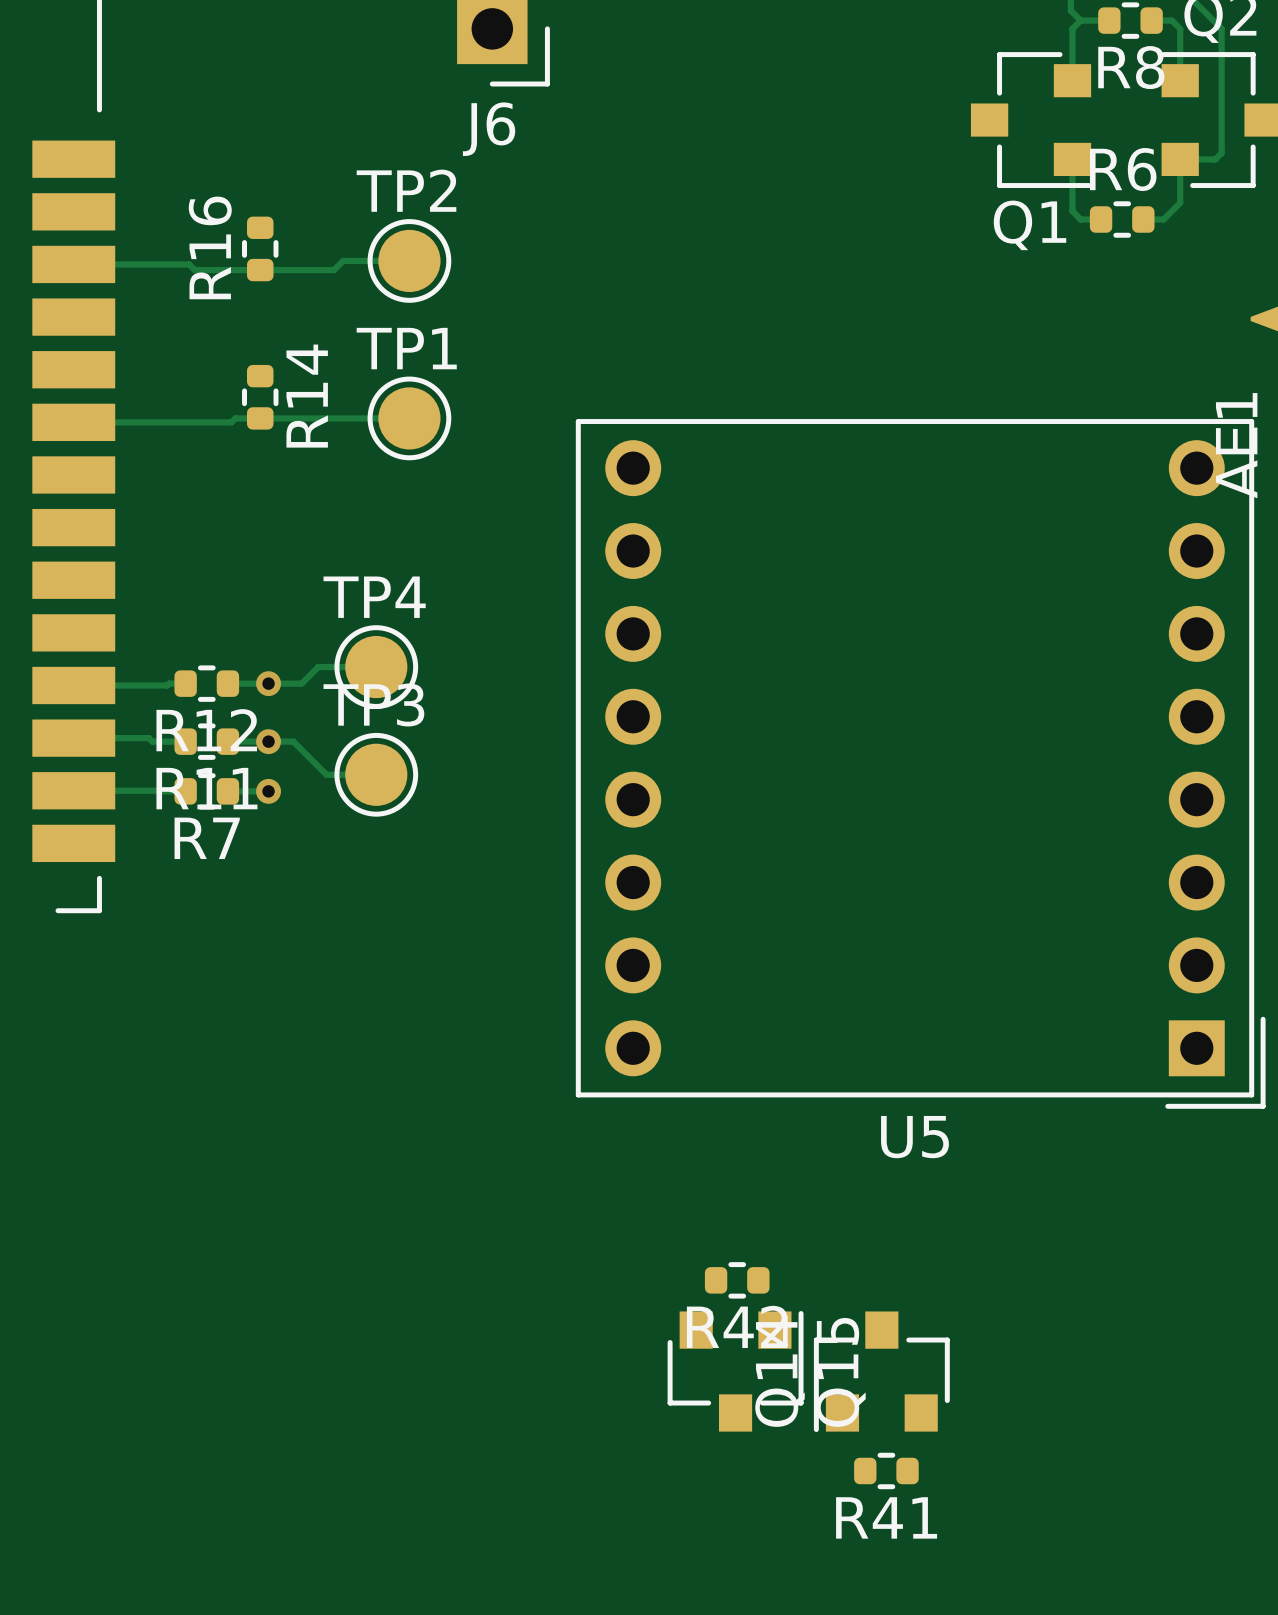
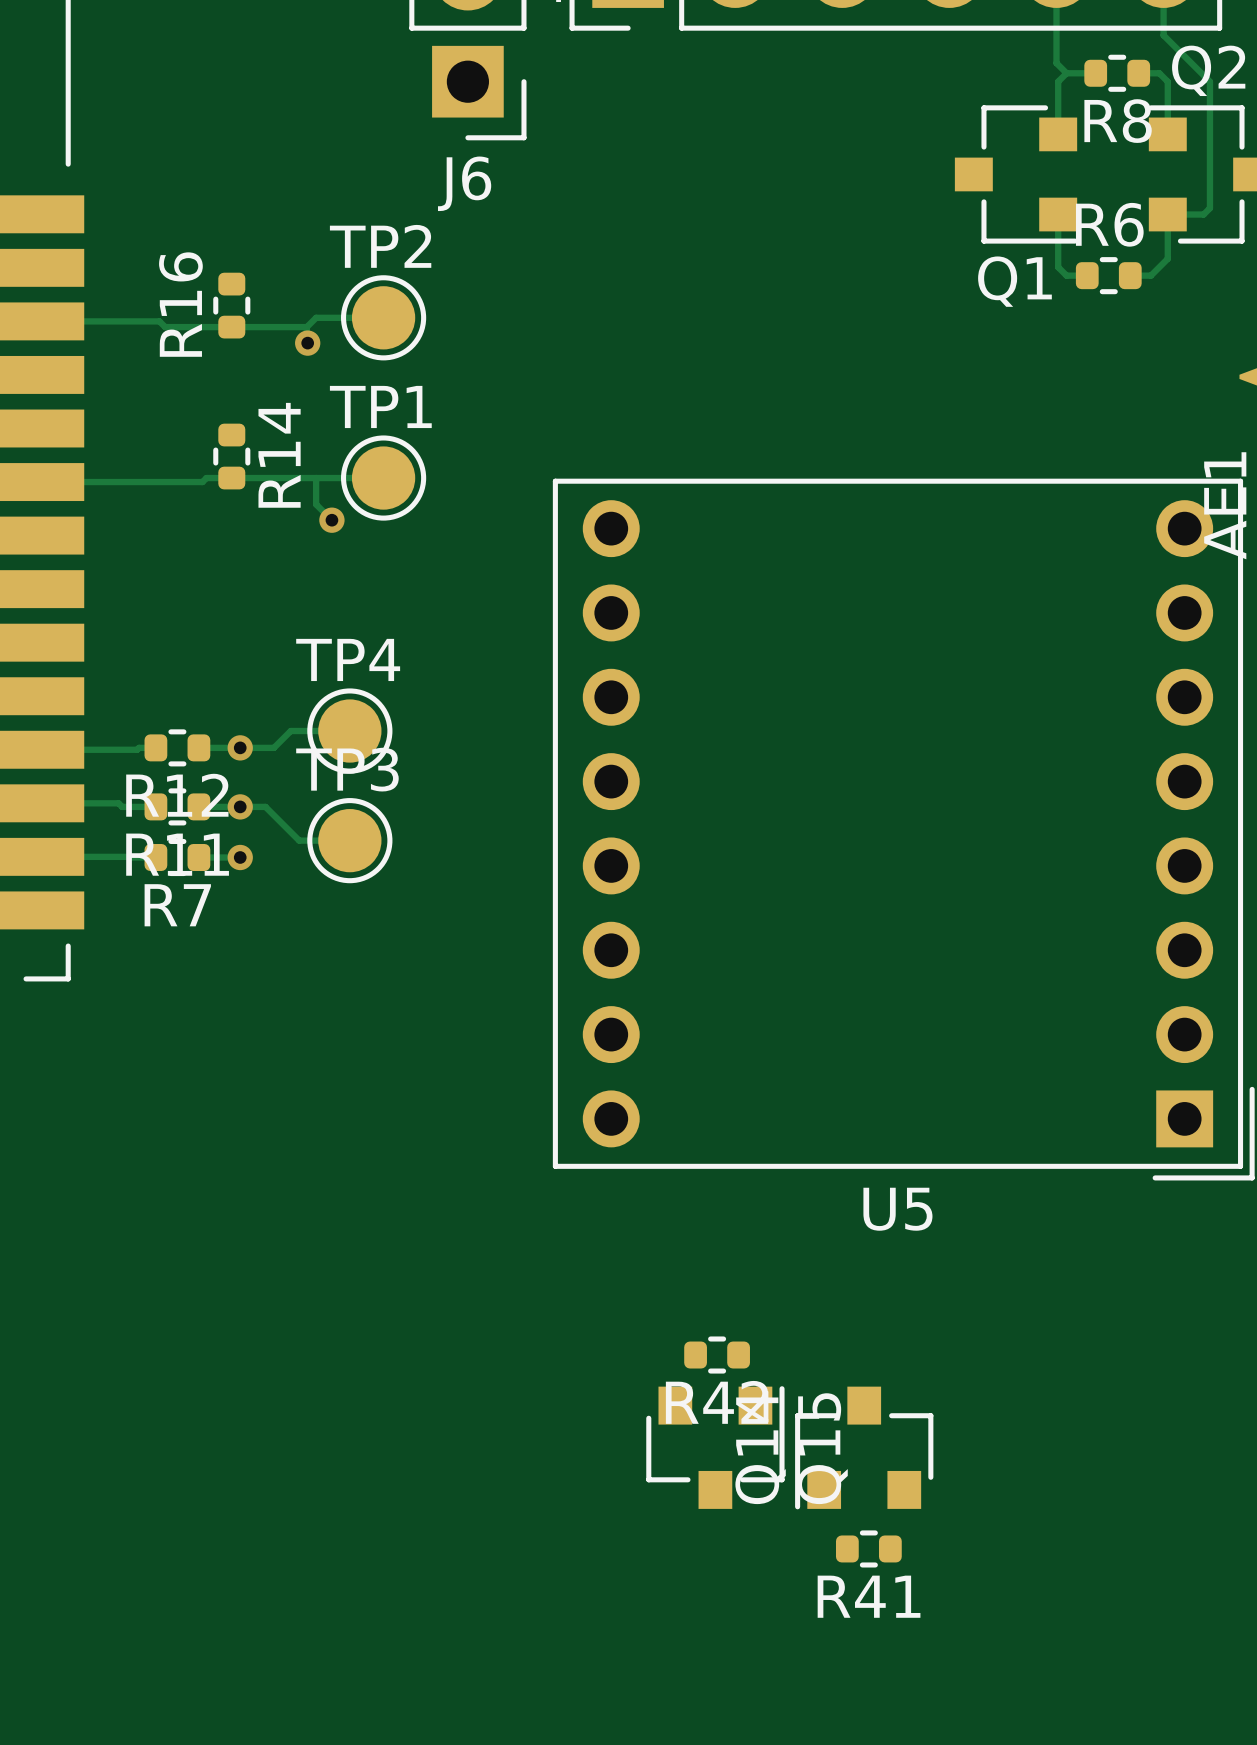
via: none -> (307, 343)
track: none -> (316, 478) (316, 504) (331, 520)
via: none -> (331, 520)

